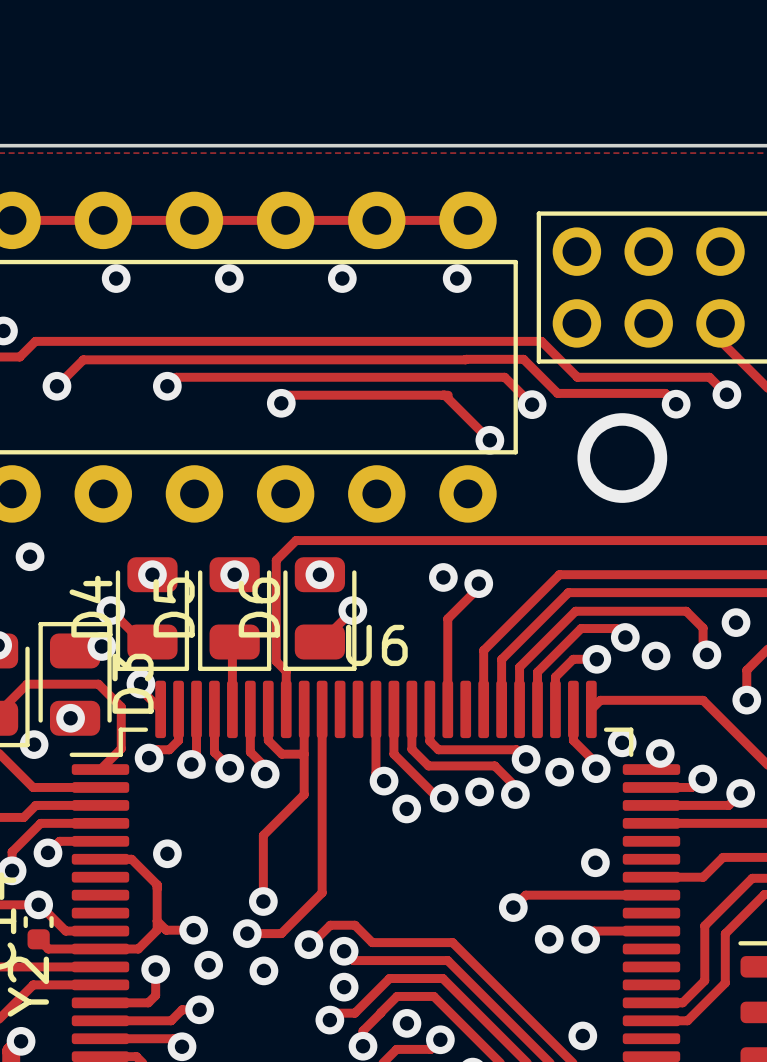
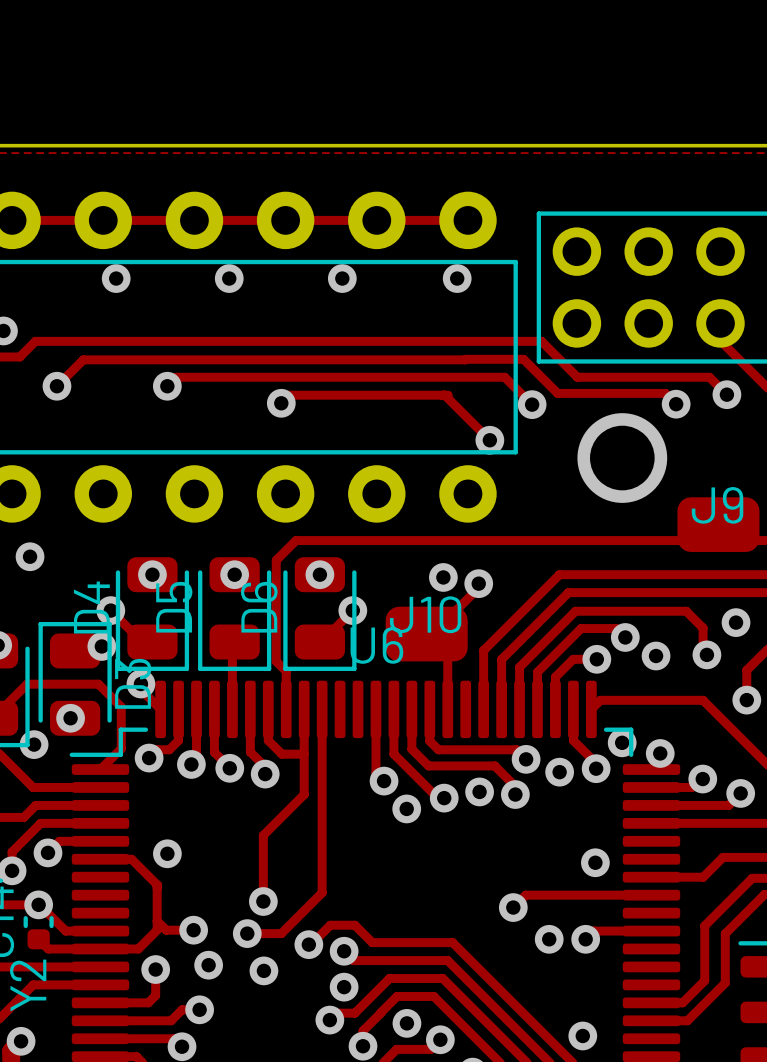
J9: none -> (718, 524)
J10: none -> (426, 634)

